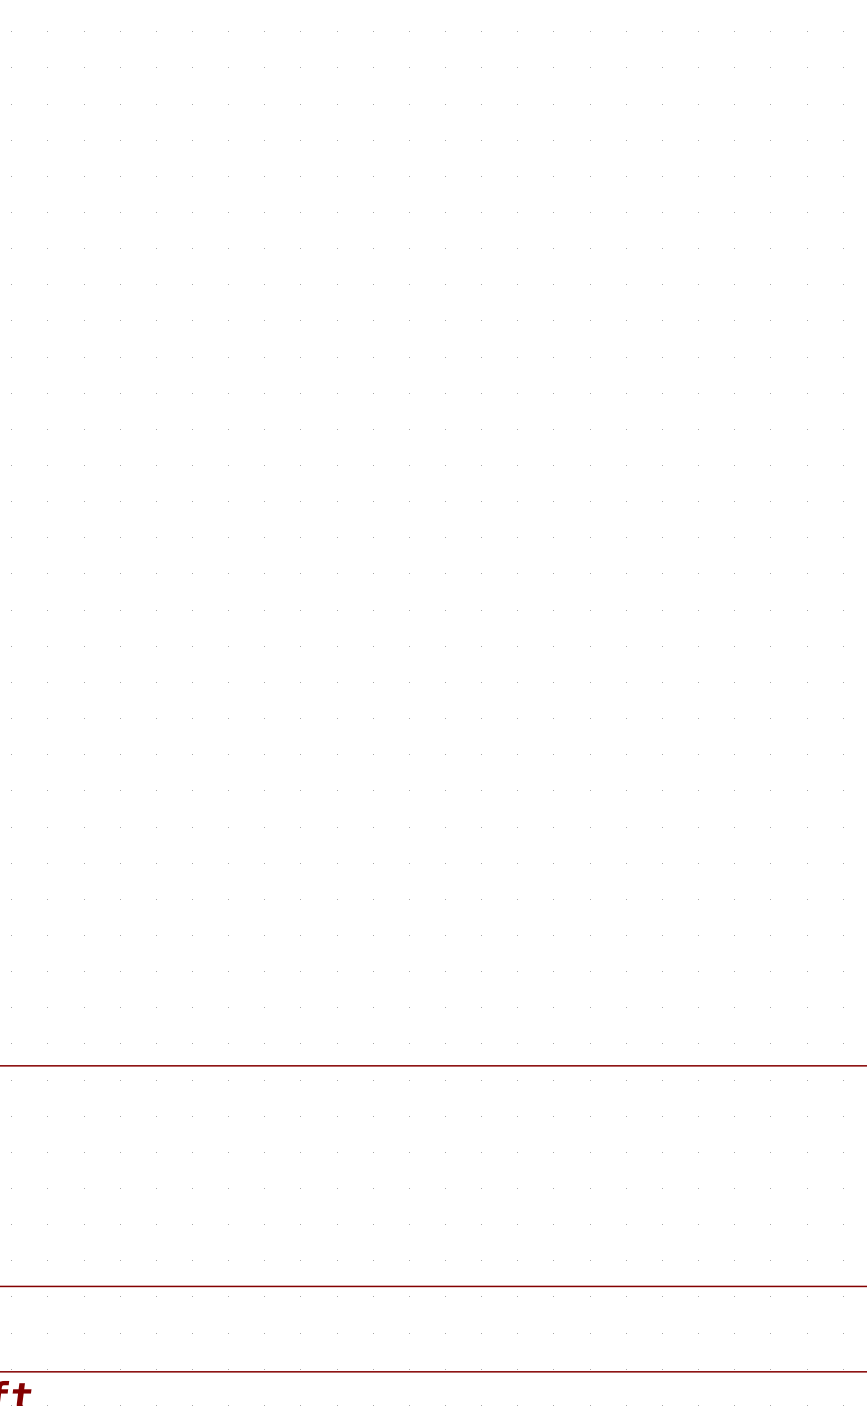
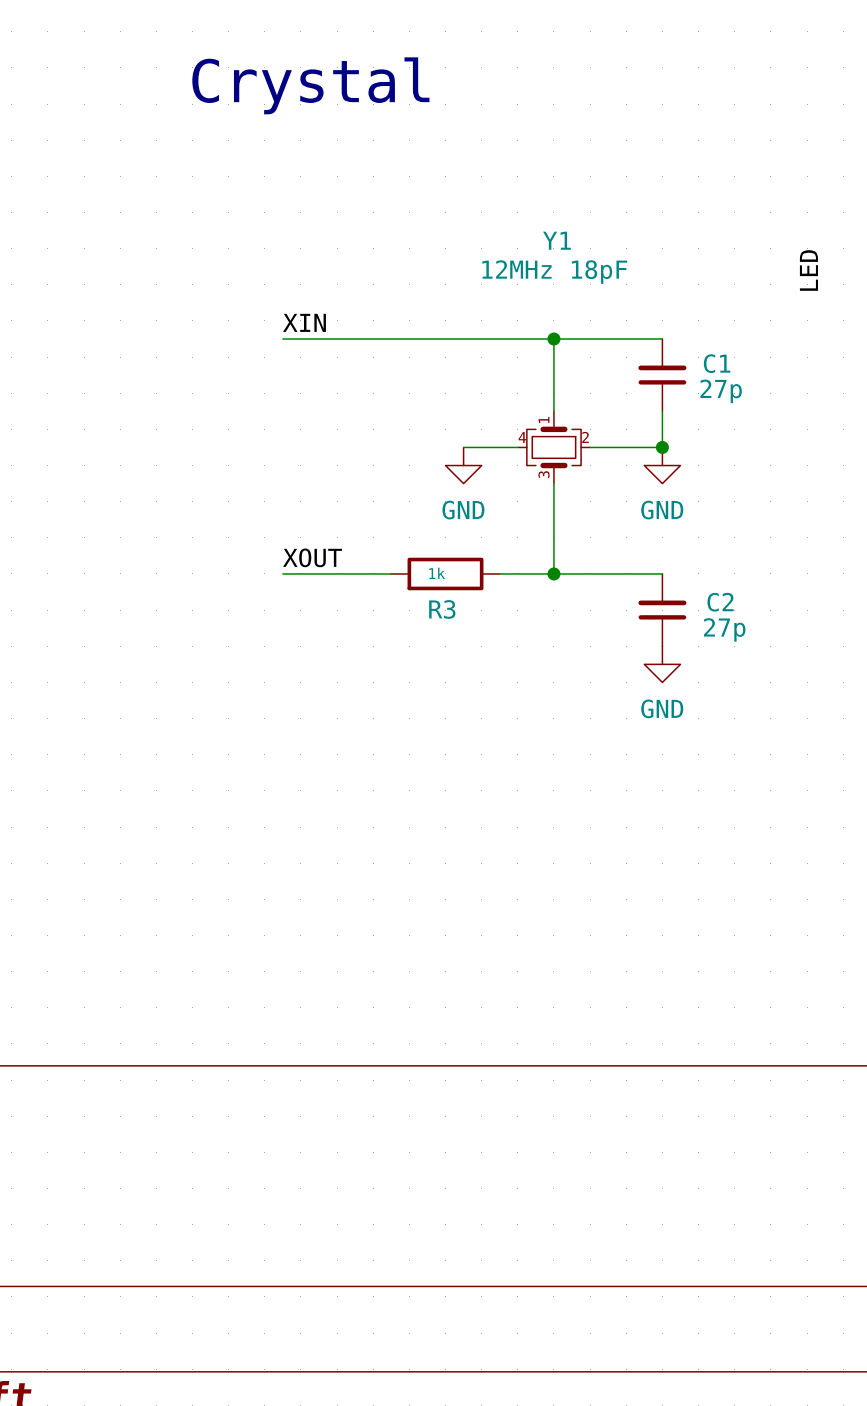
text: none -> Crystal (310, 85)
label: none -> LED (808, 270)
label: none -> XIN (304, 322)
wire: none -> (282, 339) (662, 339)
wire: none -> (553, 339) (553, 411)
junction: none -> (553, 339)
C1: none -> 27p (662, 375)
wire: none -> (662, 411) (662, 447) (590, 447)
wire: none -> (463, 447) (517, 447)
Y1: none -> 12MHz 18pF (553, 447)
junction: none -> (662, 447)
power symbol: none -> GND (463, 465)
power symbol: none -> GND (662, 465)
wire: none -> (553, 483) (553, 573)
label: none -> XOUT (312, 557)
wire: none -> (282, 573) (391, 573)
R3: none -> 1k (445, 573)
wire: none -> (499, 573) (662, 573)
junction: none -> (553, 573)
C2: none -> 27p (662, 610)
power symbol: none -> GND (662, 664)

